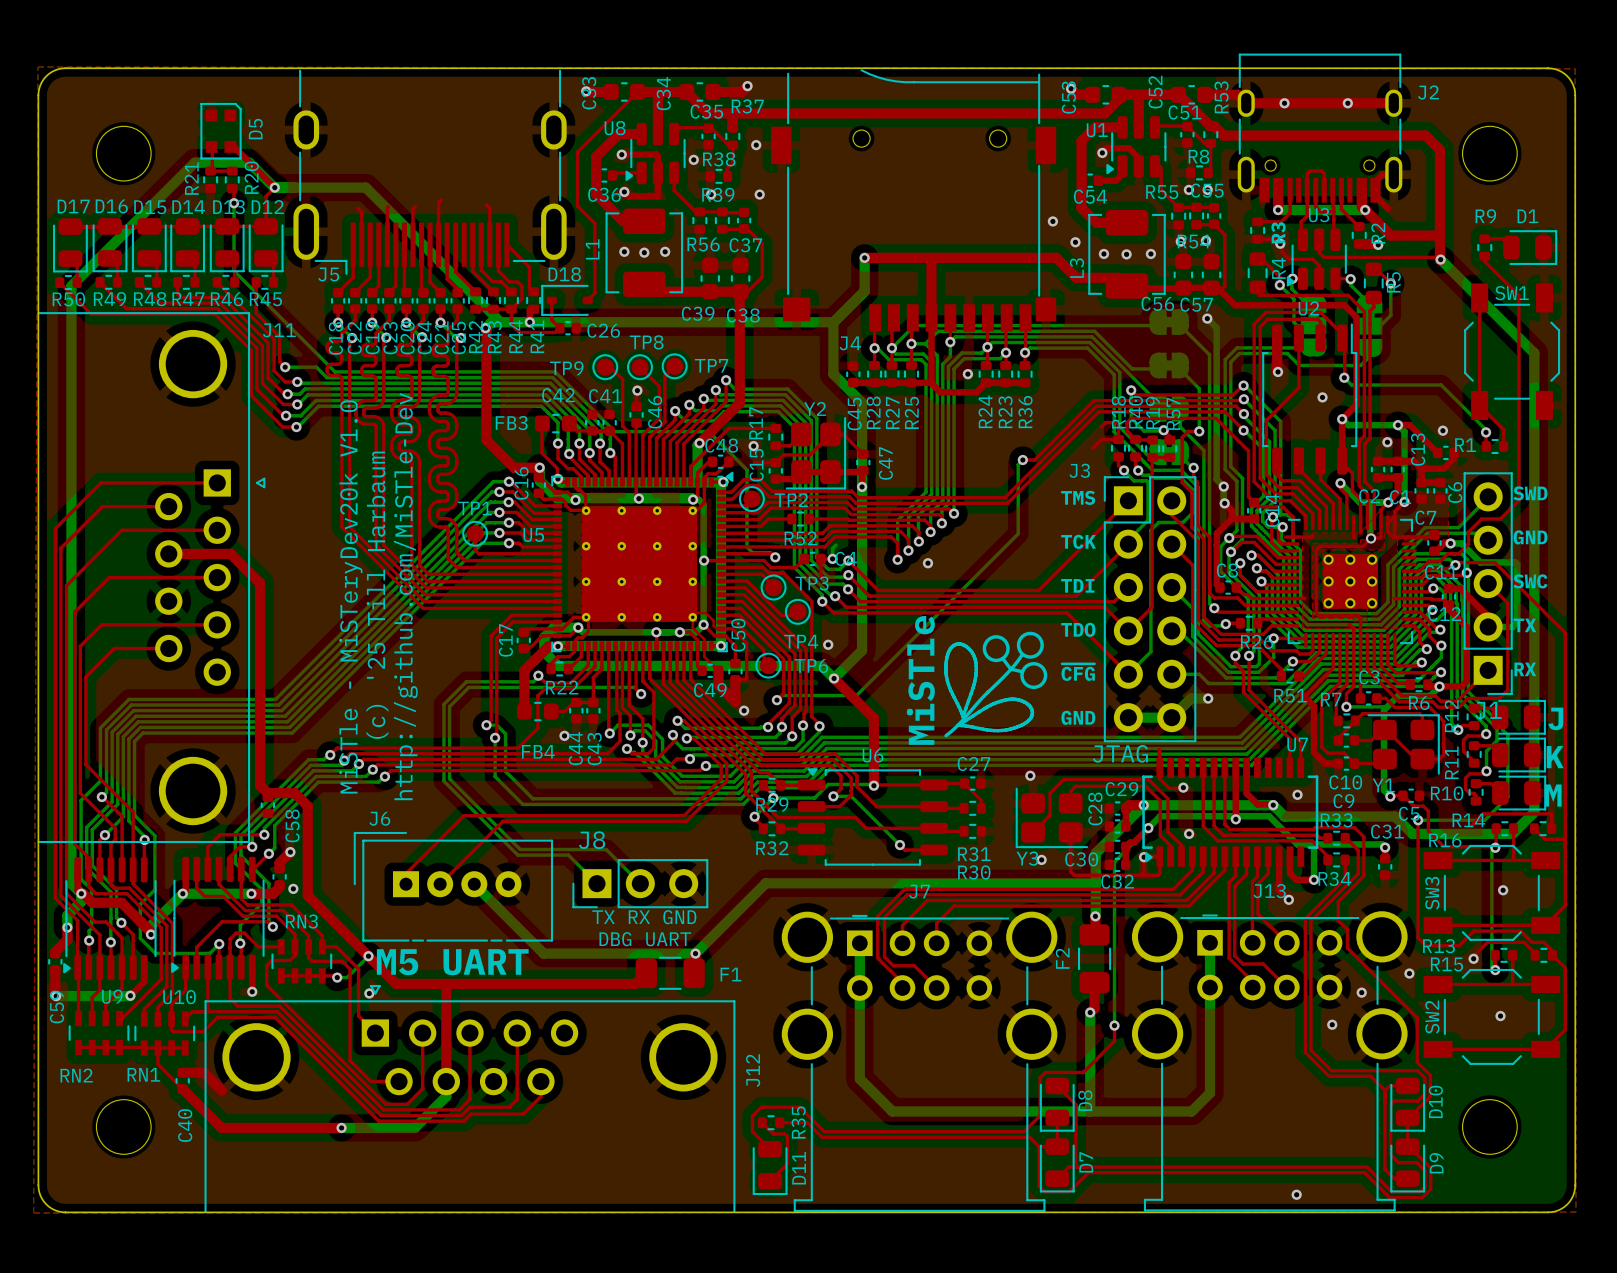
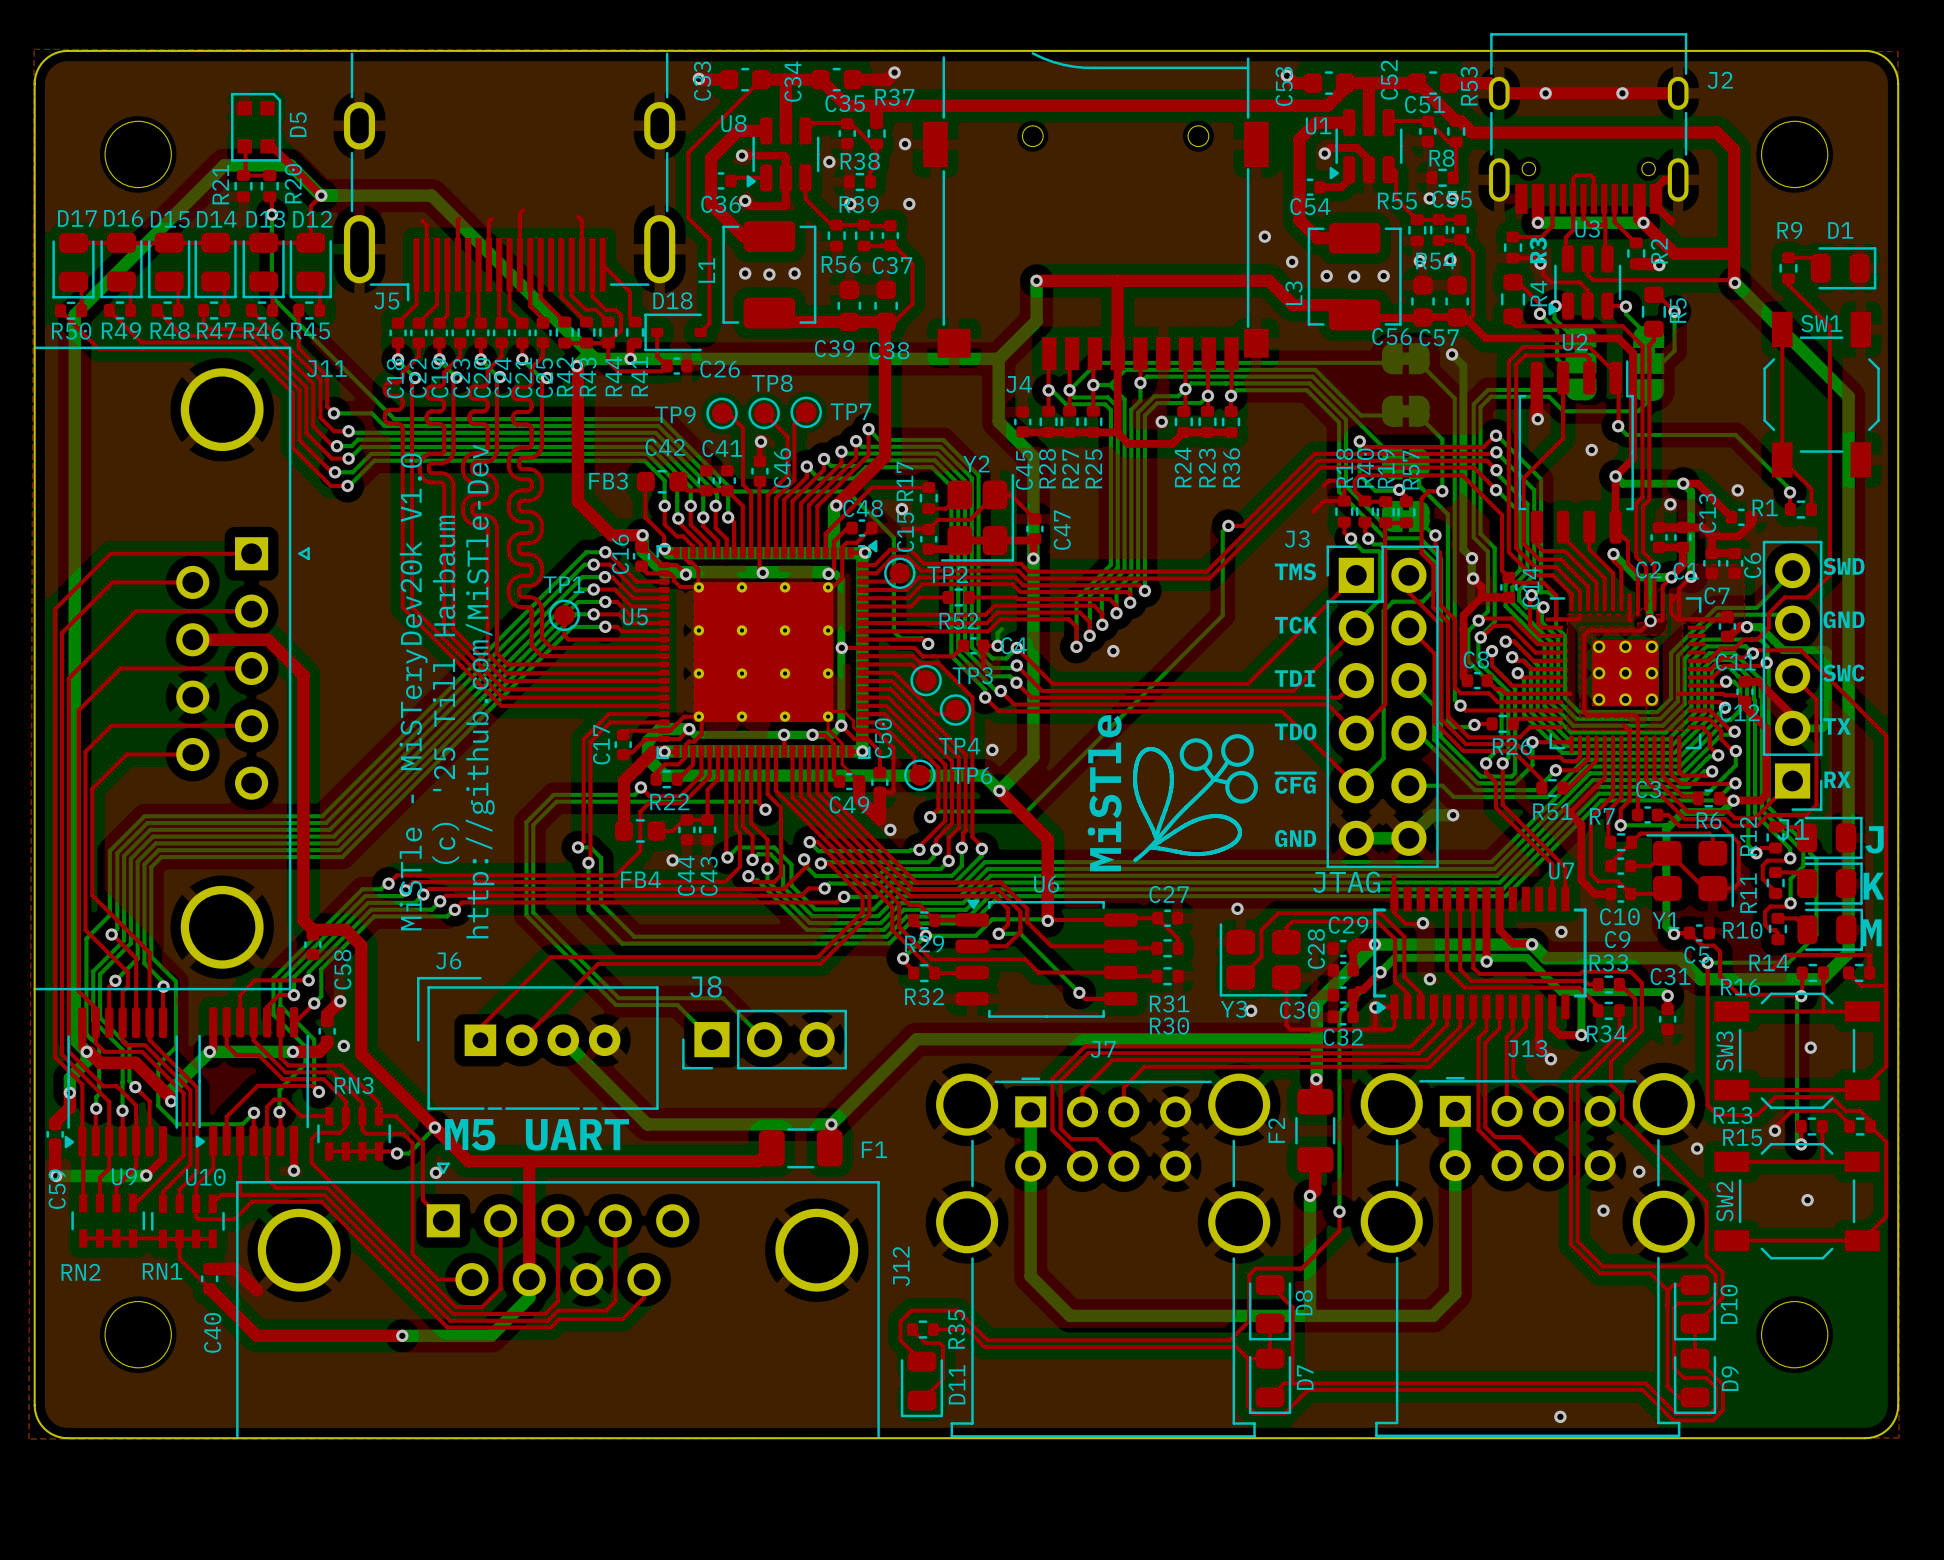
text: TX RX GND (644, 917) -> none
text: DBG UART (645, 939) -> none

